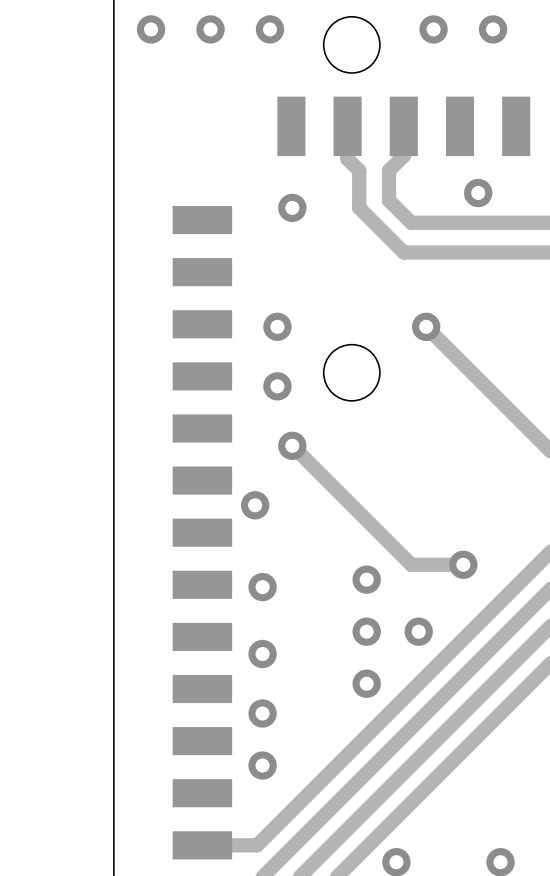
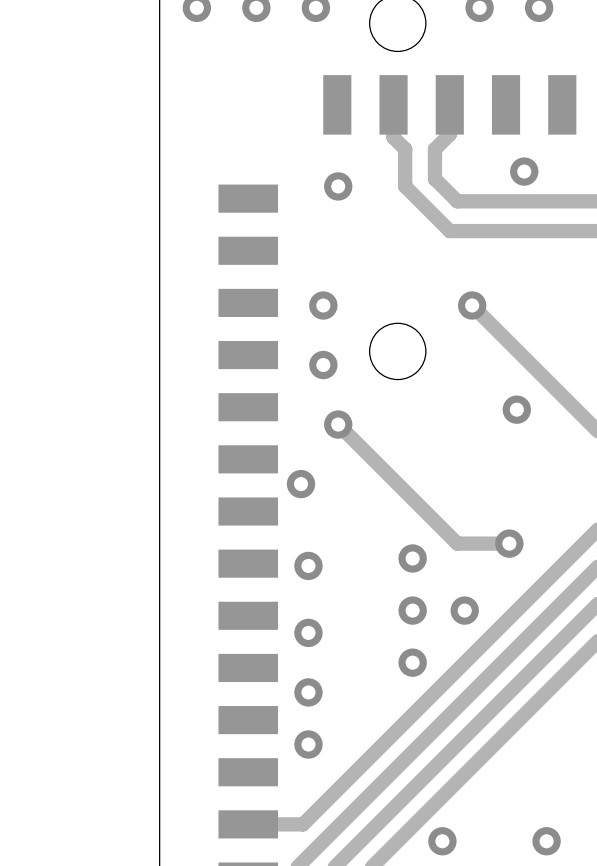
via: none -> (516, 409)

